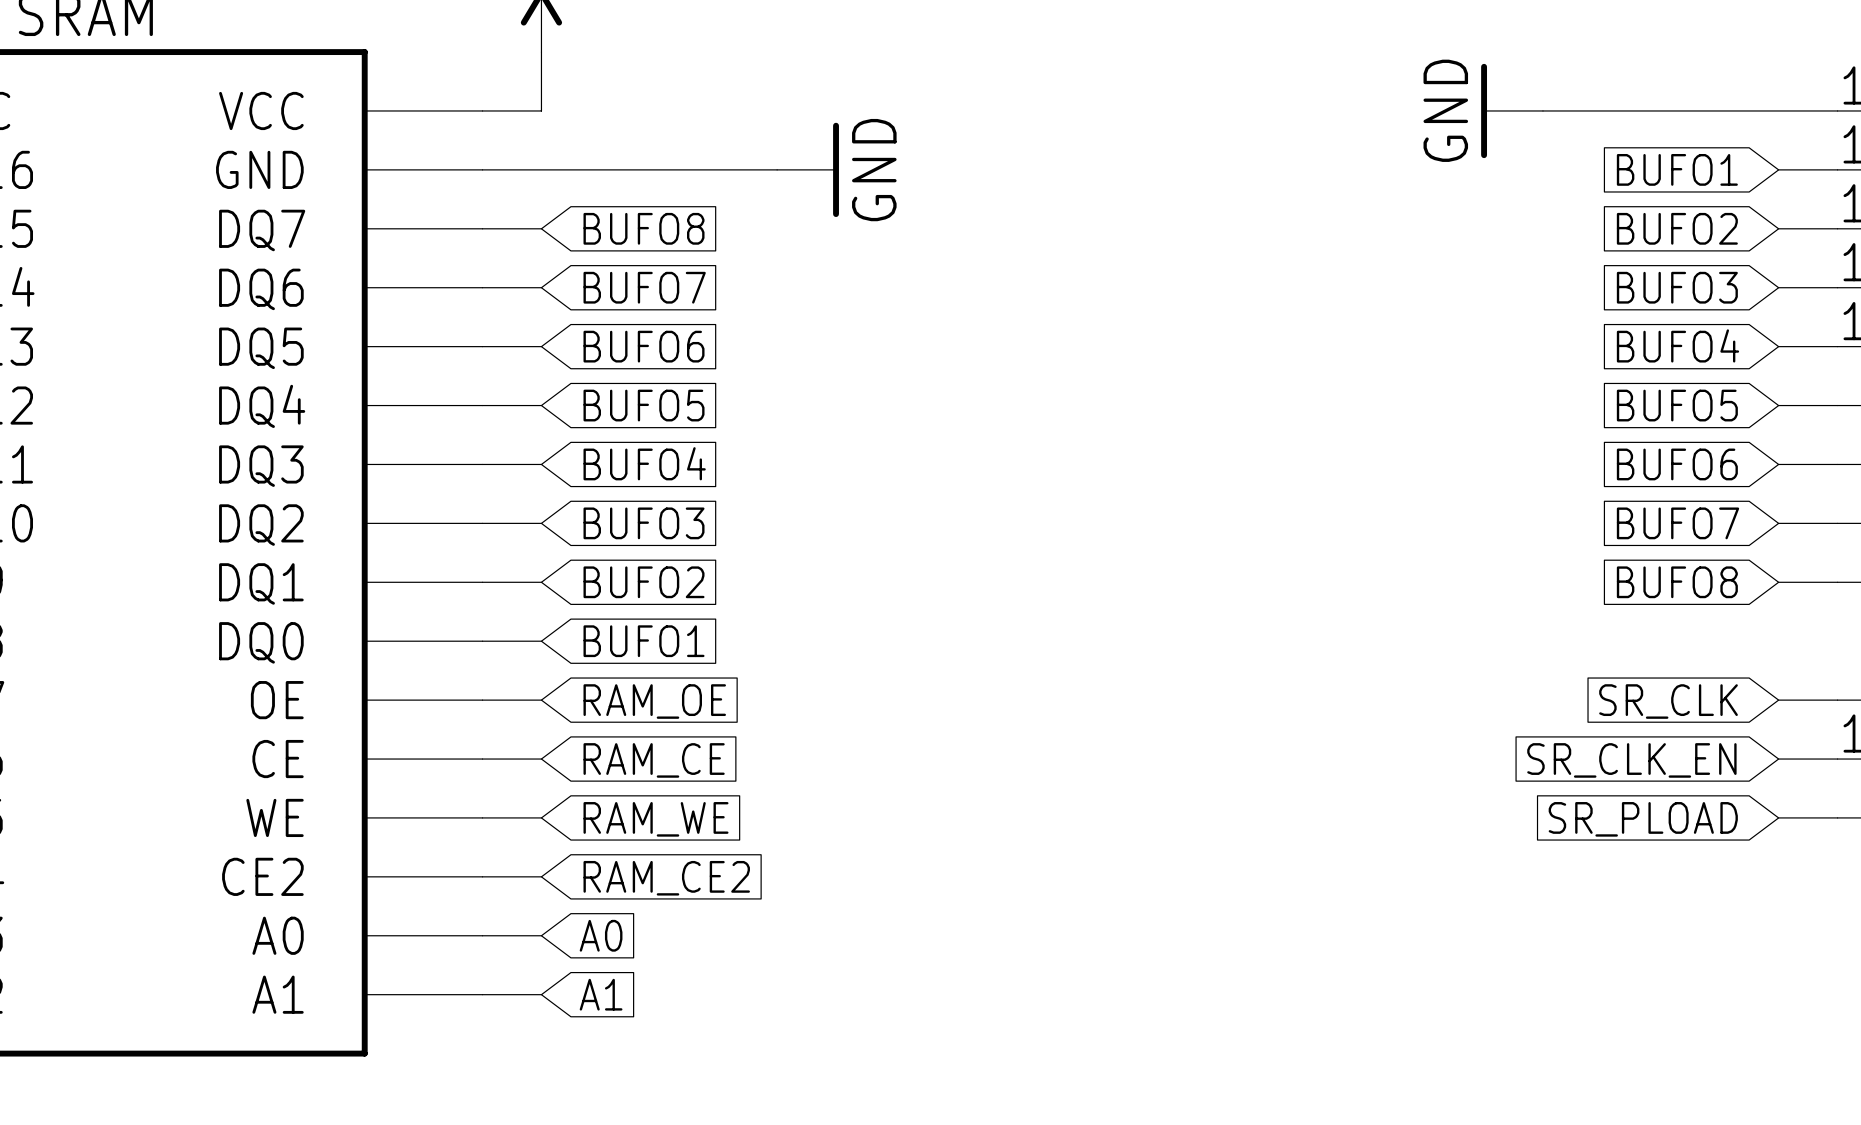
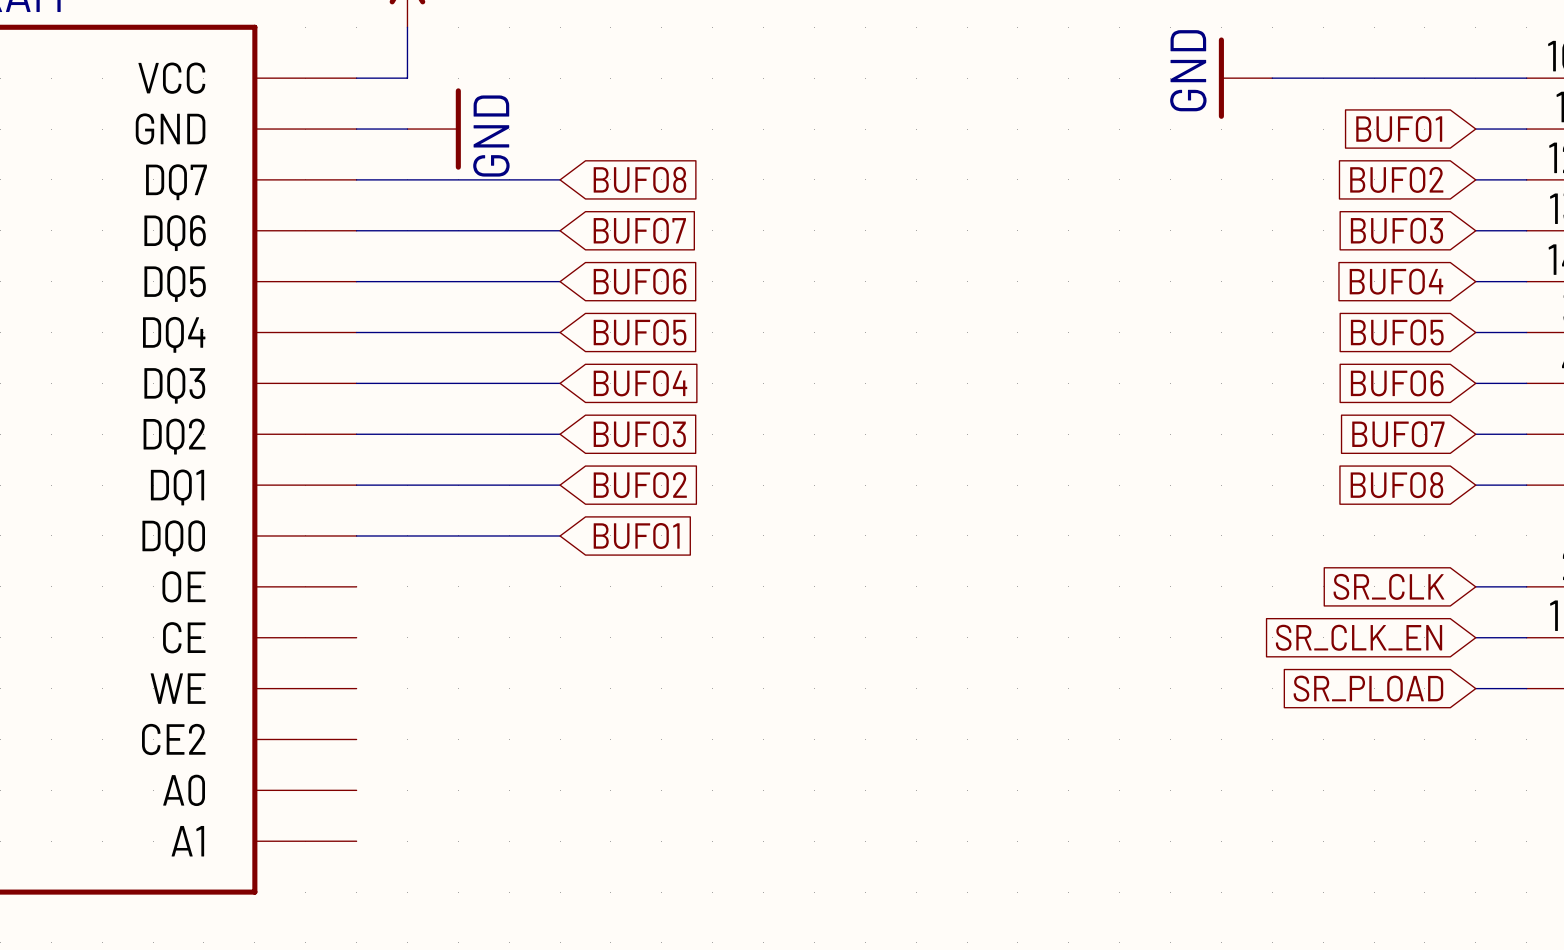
wire: (541, 169) (777, 169) -> none
power symbol position: GND (808, 169) -> GND (434, 129)
wire: none -> (407, 179) (560, 179)
global label position: BUFO8 (644, 228) -> BUFO8 (639, 179)
wire: none -> (407, 230) (560, 230)
global label position: BUFO7 (644, 287) -> BUFO7 (639, 230)
wire: none -> (407, 281) (560, 281)
global label position: BUFO6 (644, 346) -> BUFO6 (640, 281)
wire: none -> (407, 332) (560, 332)
global label position: BUFO5 (644, 405) -> BUFO5 (640, 332)
global label position: BUFO4 (644, 463) -> BUFO4 (640, 383)
wire: none -> (407, 383) (560, 383)
wire: none -> (407, 434) (560, 434)
global label position: BUFO3 (644, 523) -> BUFO3 (639, 434)
wire: none -> (407, 485) (560, 485)
global label position: BUFO2 (644, 582) -> BUFO2 (640, 485)
wire: none -> (407, 535) (560, 535)
global label position: BUFO1 (644, 641) -> BUFO1 (636, 535)
wire: (482, 700) (541, 700) -> none
global label: RAM_OE (654, 701) -> none
wire: (482, 759) (541, 759) -> none
global label: RAM_CE (654, 760) -> none
wire: (482, 817) (541, 817) -> none
global label: RAM_WE (655, 819) -> none
wire: (482, 876) (541, 876) -> none
global label: RAM_CE2 (666, 878) -> none
wire: (482, 935) (541, 935) -> none
global label: A0 (601, 935) -> none
wire: (482, 994) (541, 994) -> none
global label: A1 (601, 994) -> none

